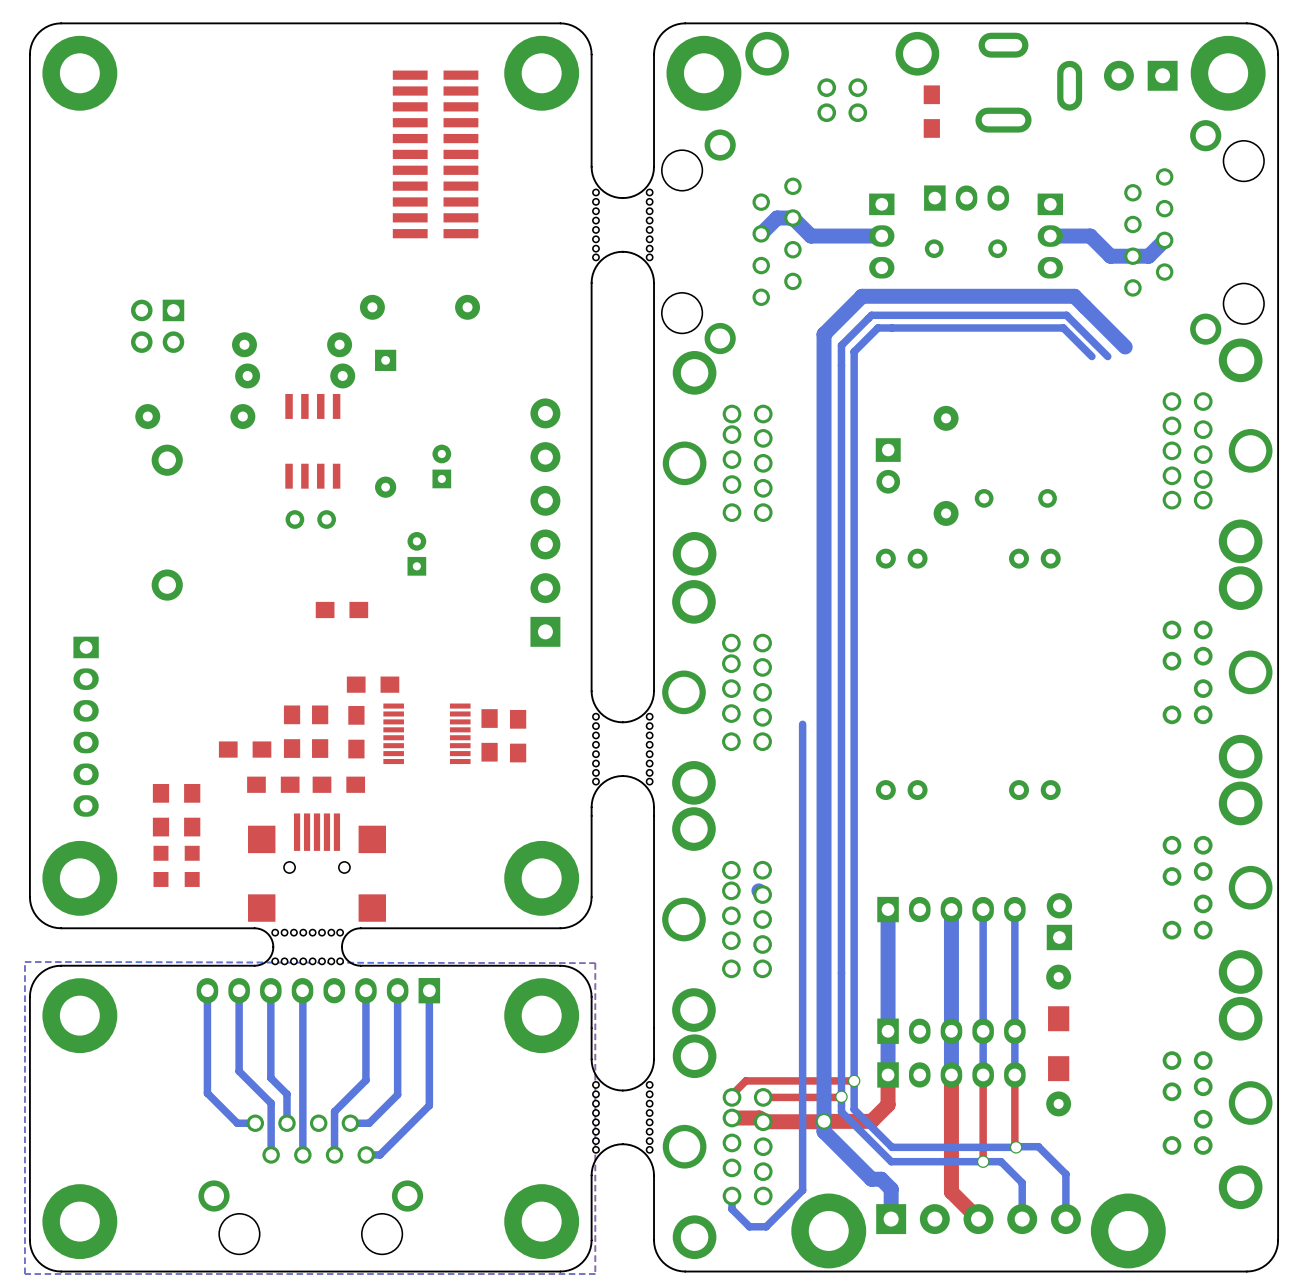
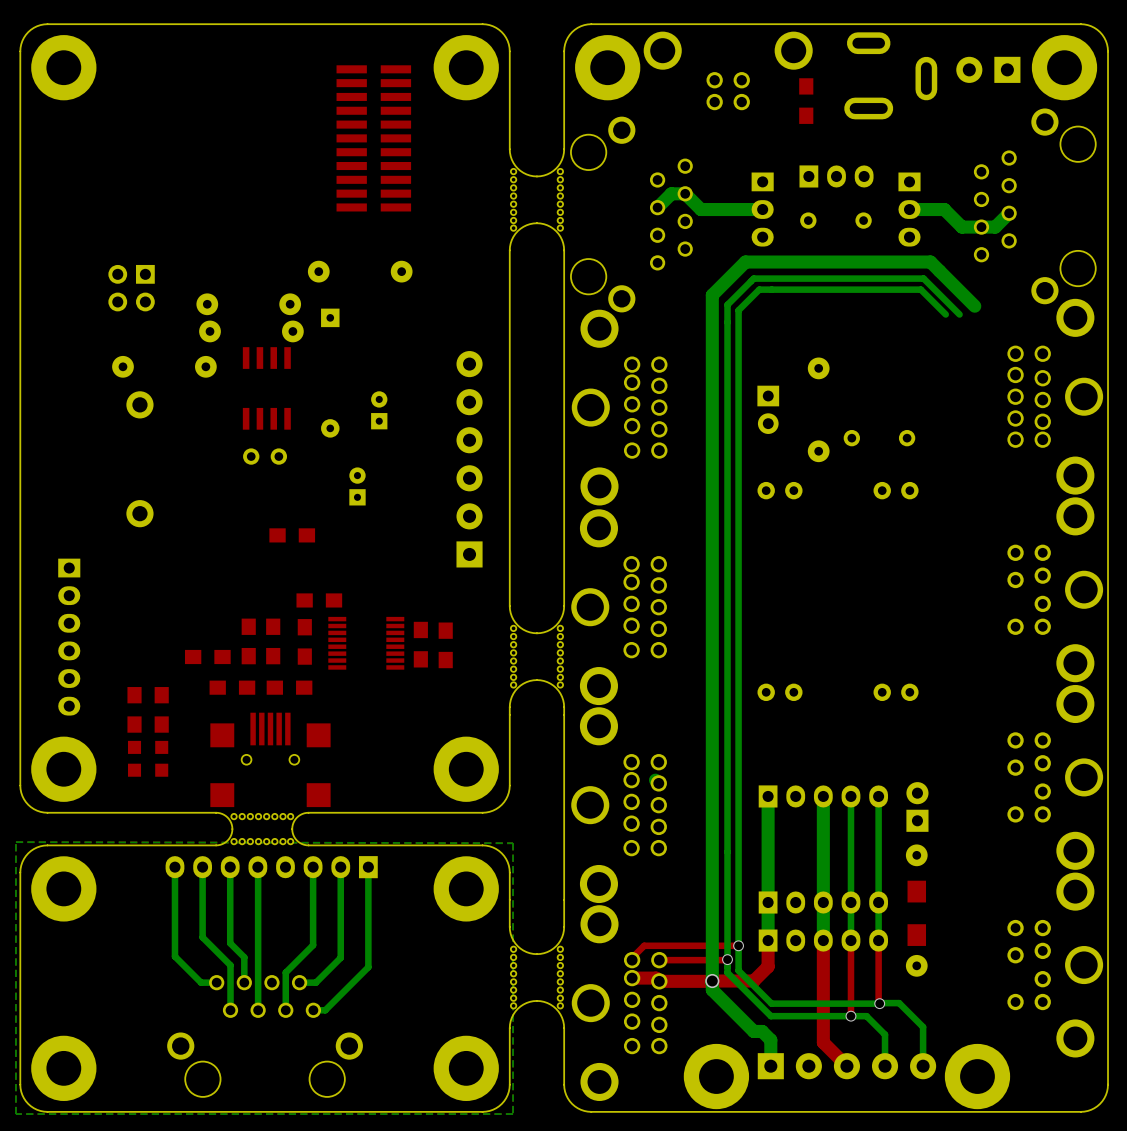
bottom track: (802, 724) (802, 1190) (766, 1226) (749, 1226) (732, 1209) (732, 1196) -> none

